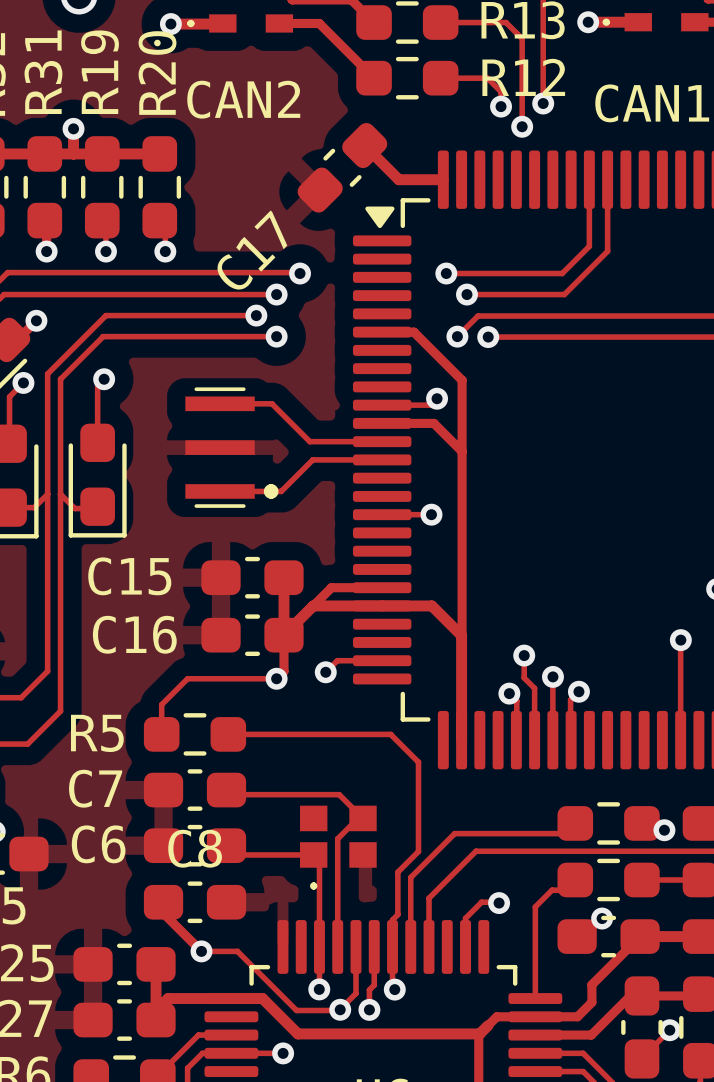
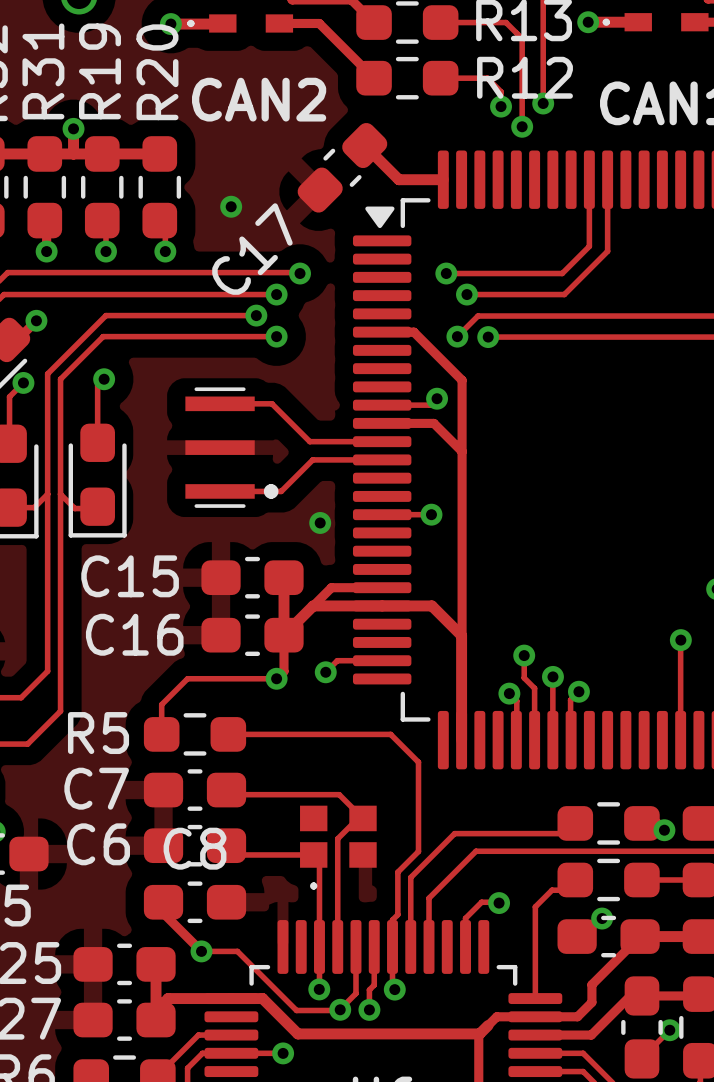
via: none -> (231, 206)
via: none -> (320, 522)

